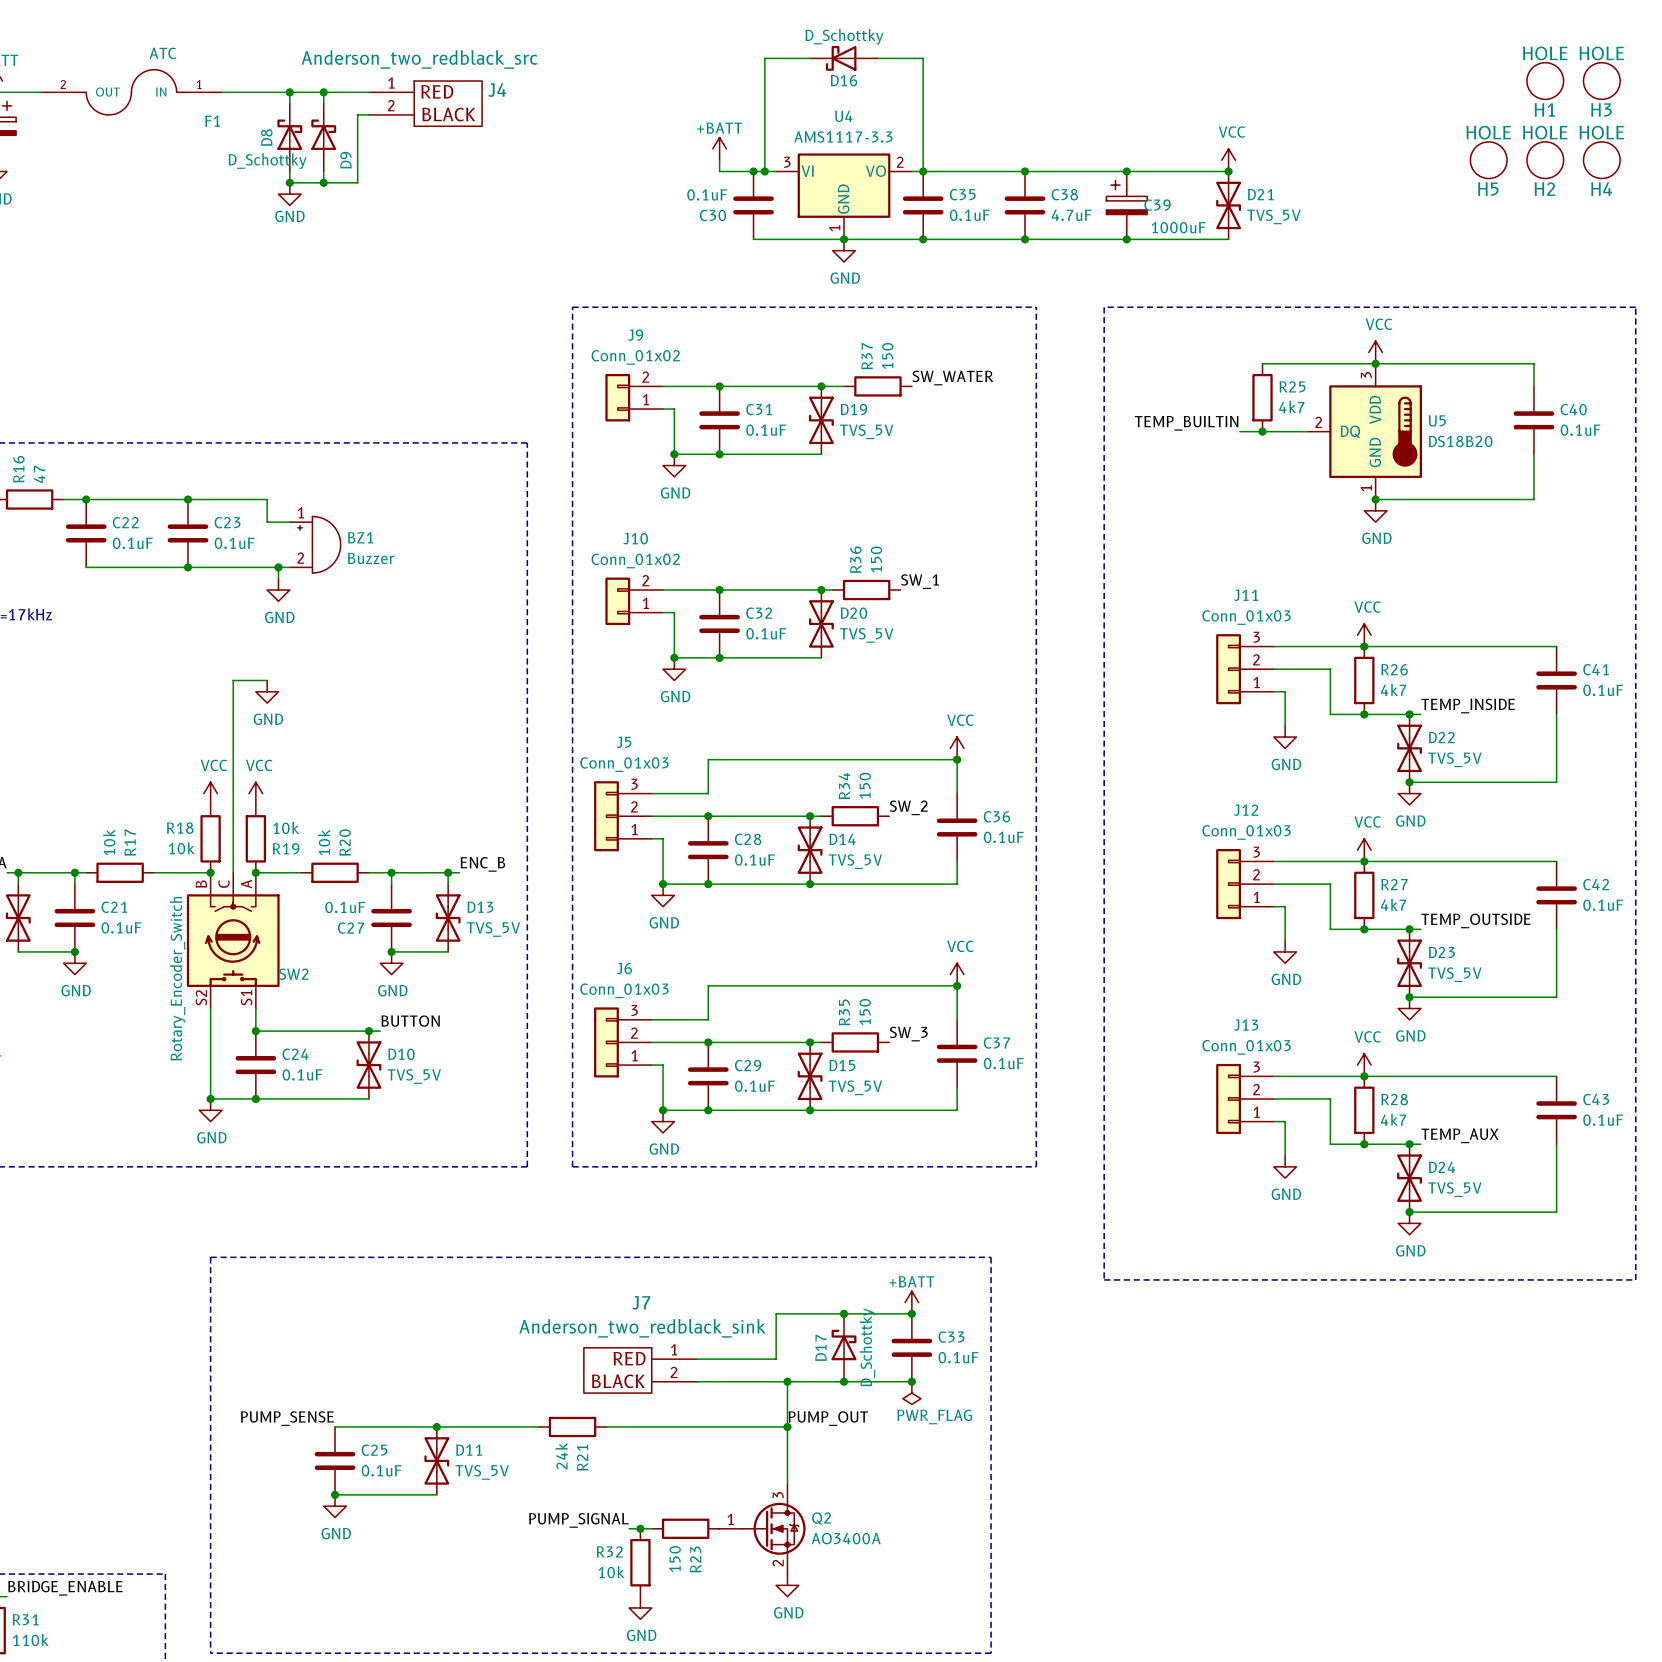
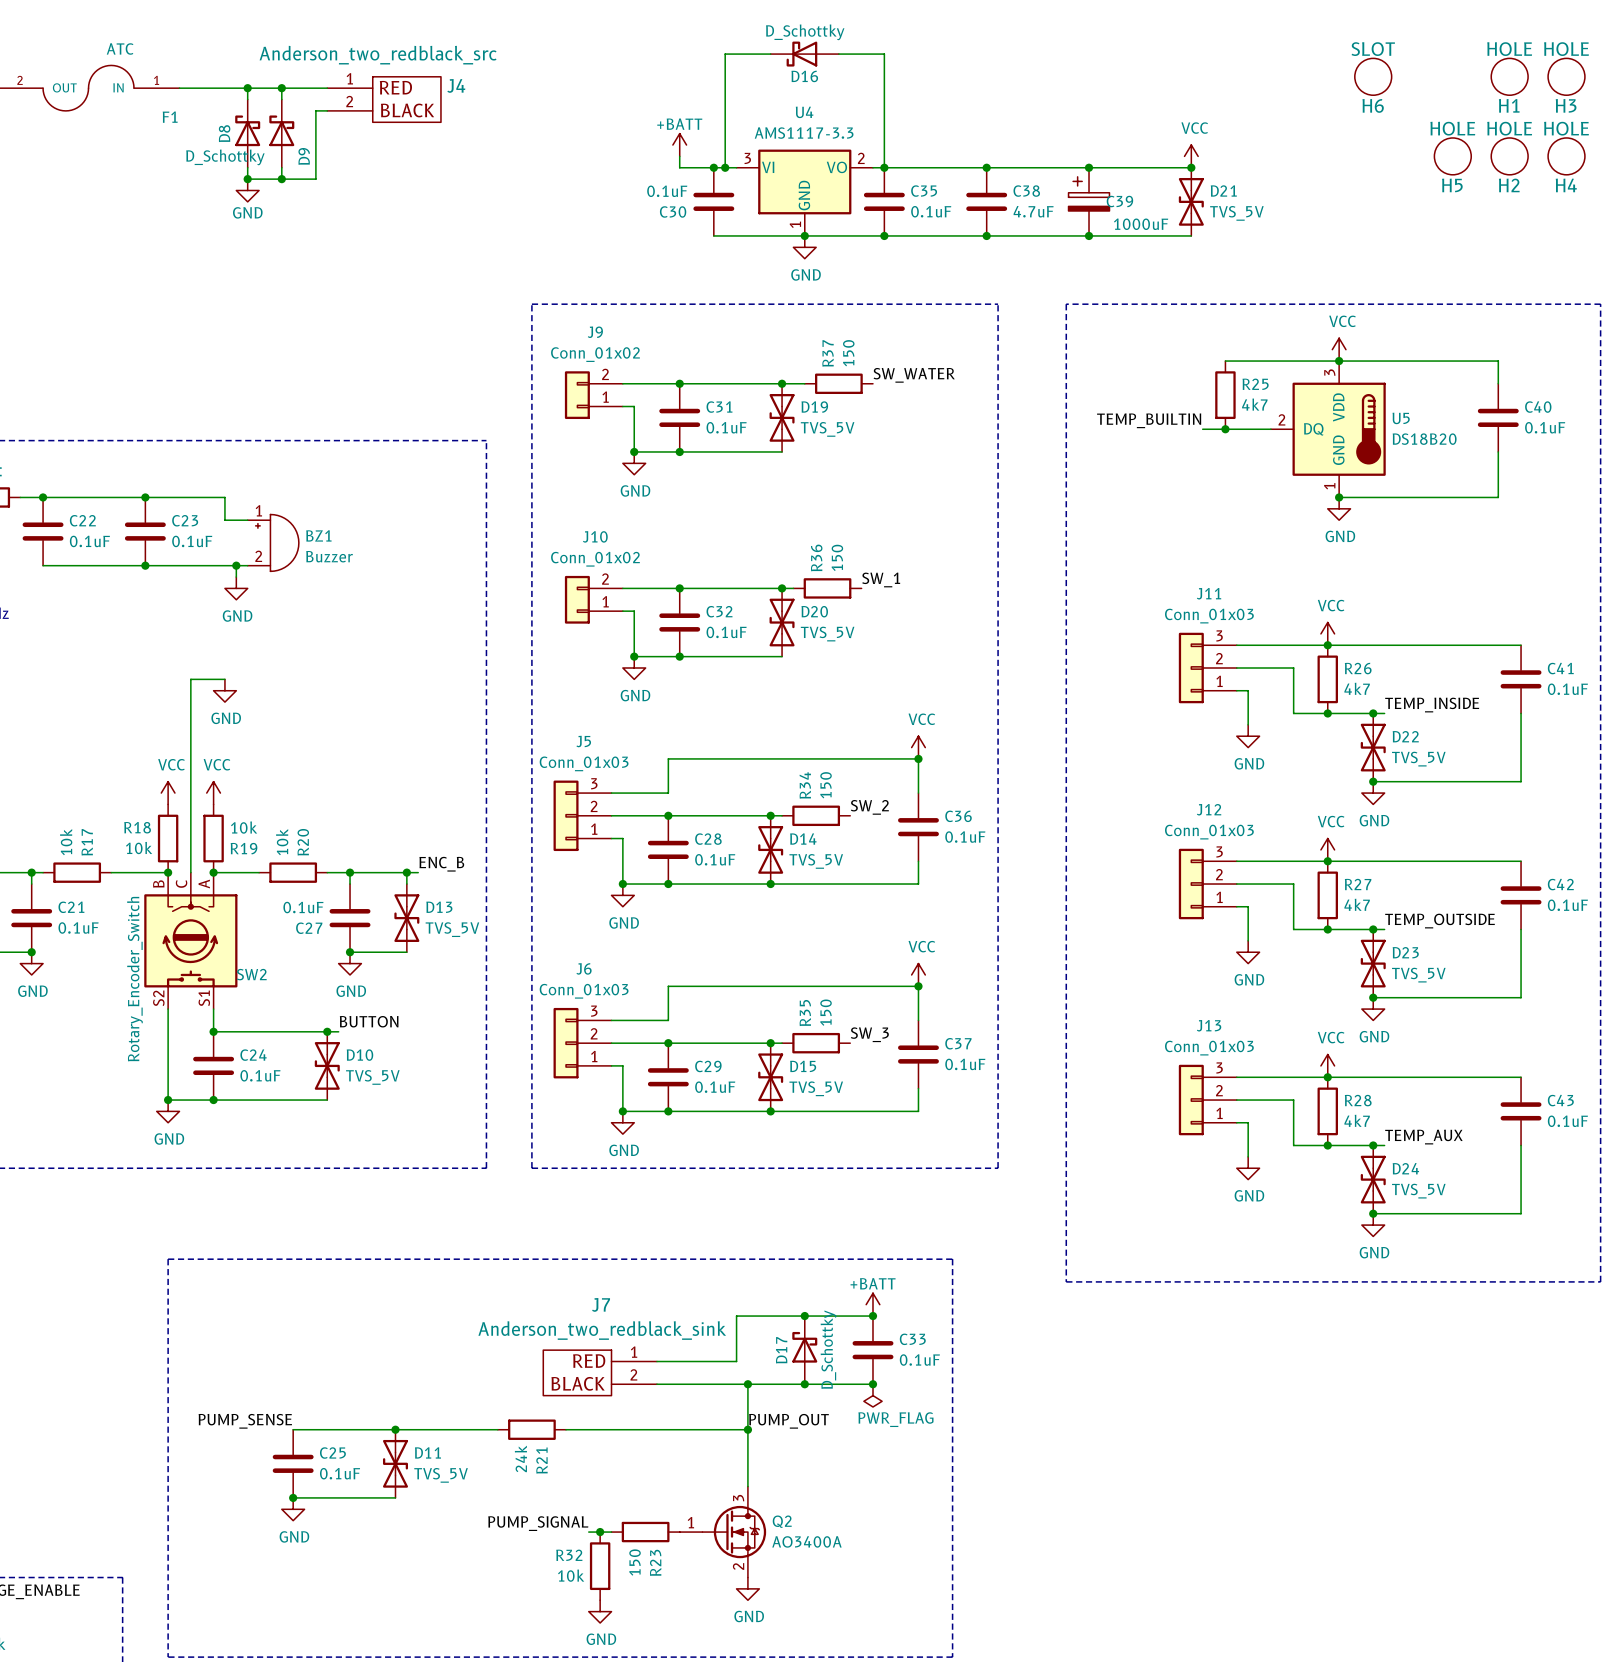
H6: none -> SLOT (1373, 76)

